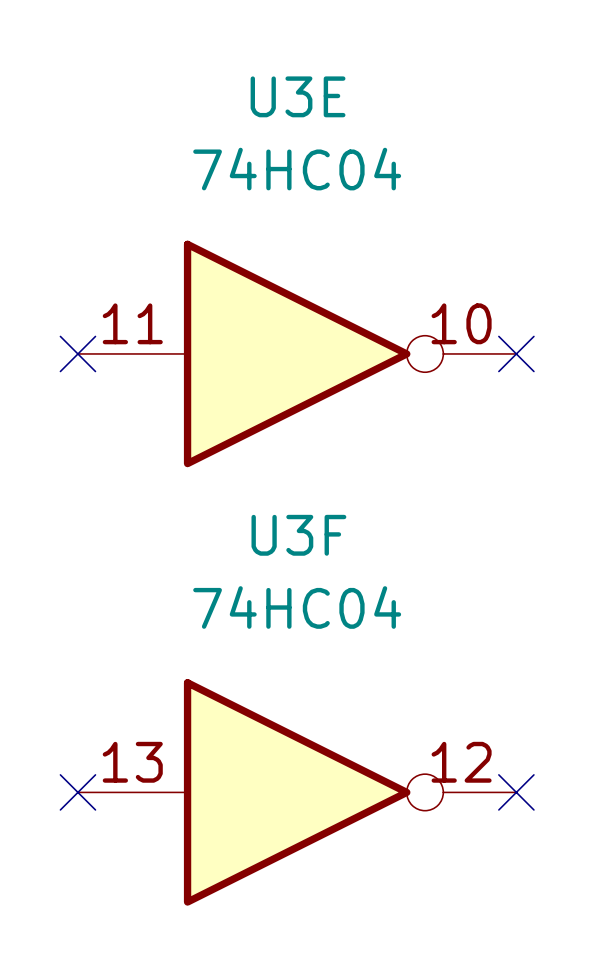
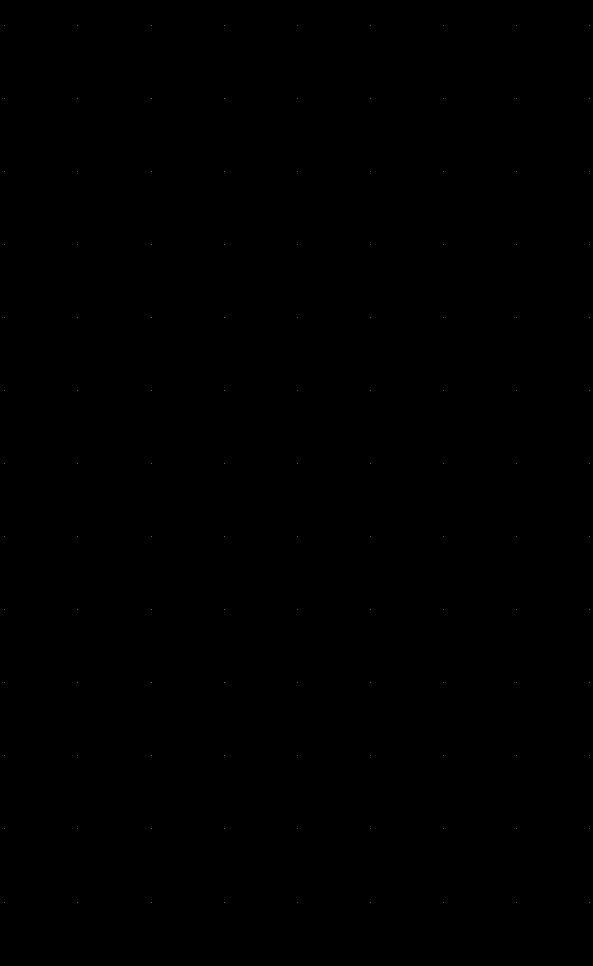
no-connect mark: (77, 353) -> none
U3E: 74HC04 (297, 353) -> none
no-connect mark: (516, 353) -> none
no-connect mark: (77, 792) -> none
U3F: 74HC04 (297, 792) -> none
no-connect mark: (516, 792) -> none

